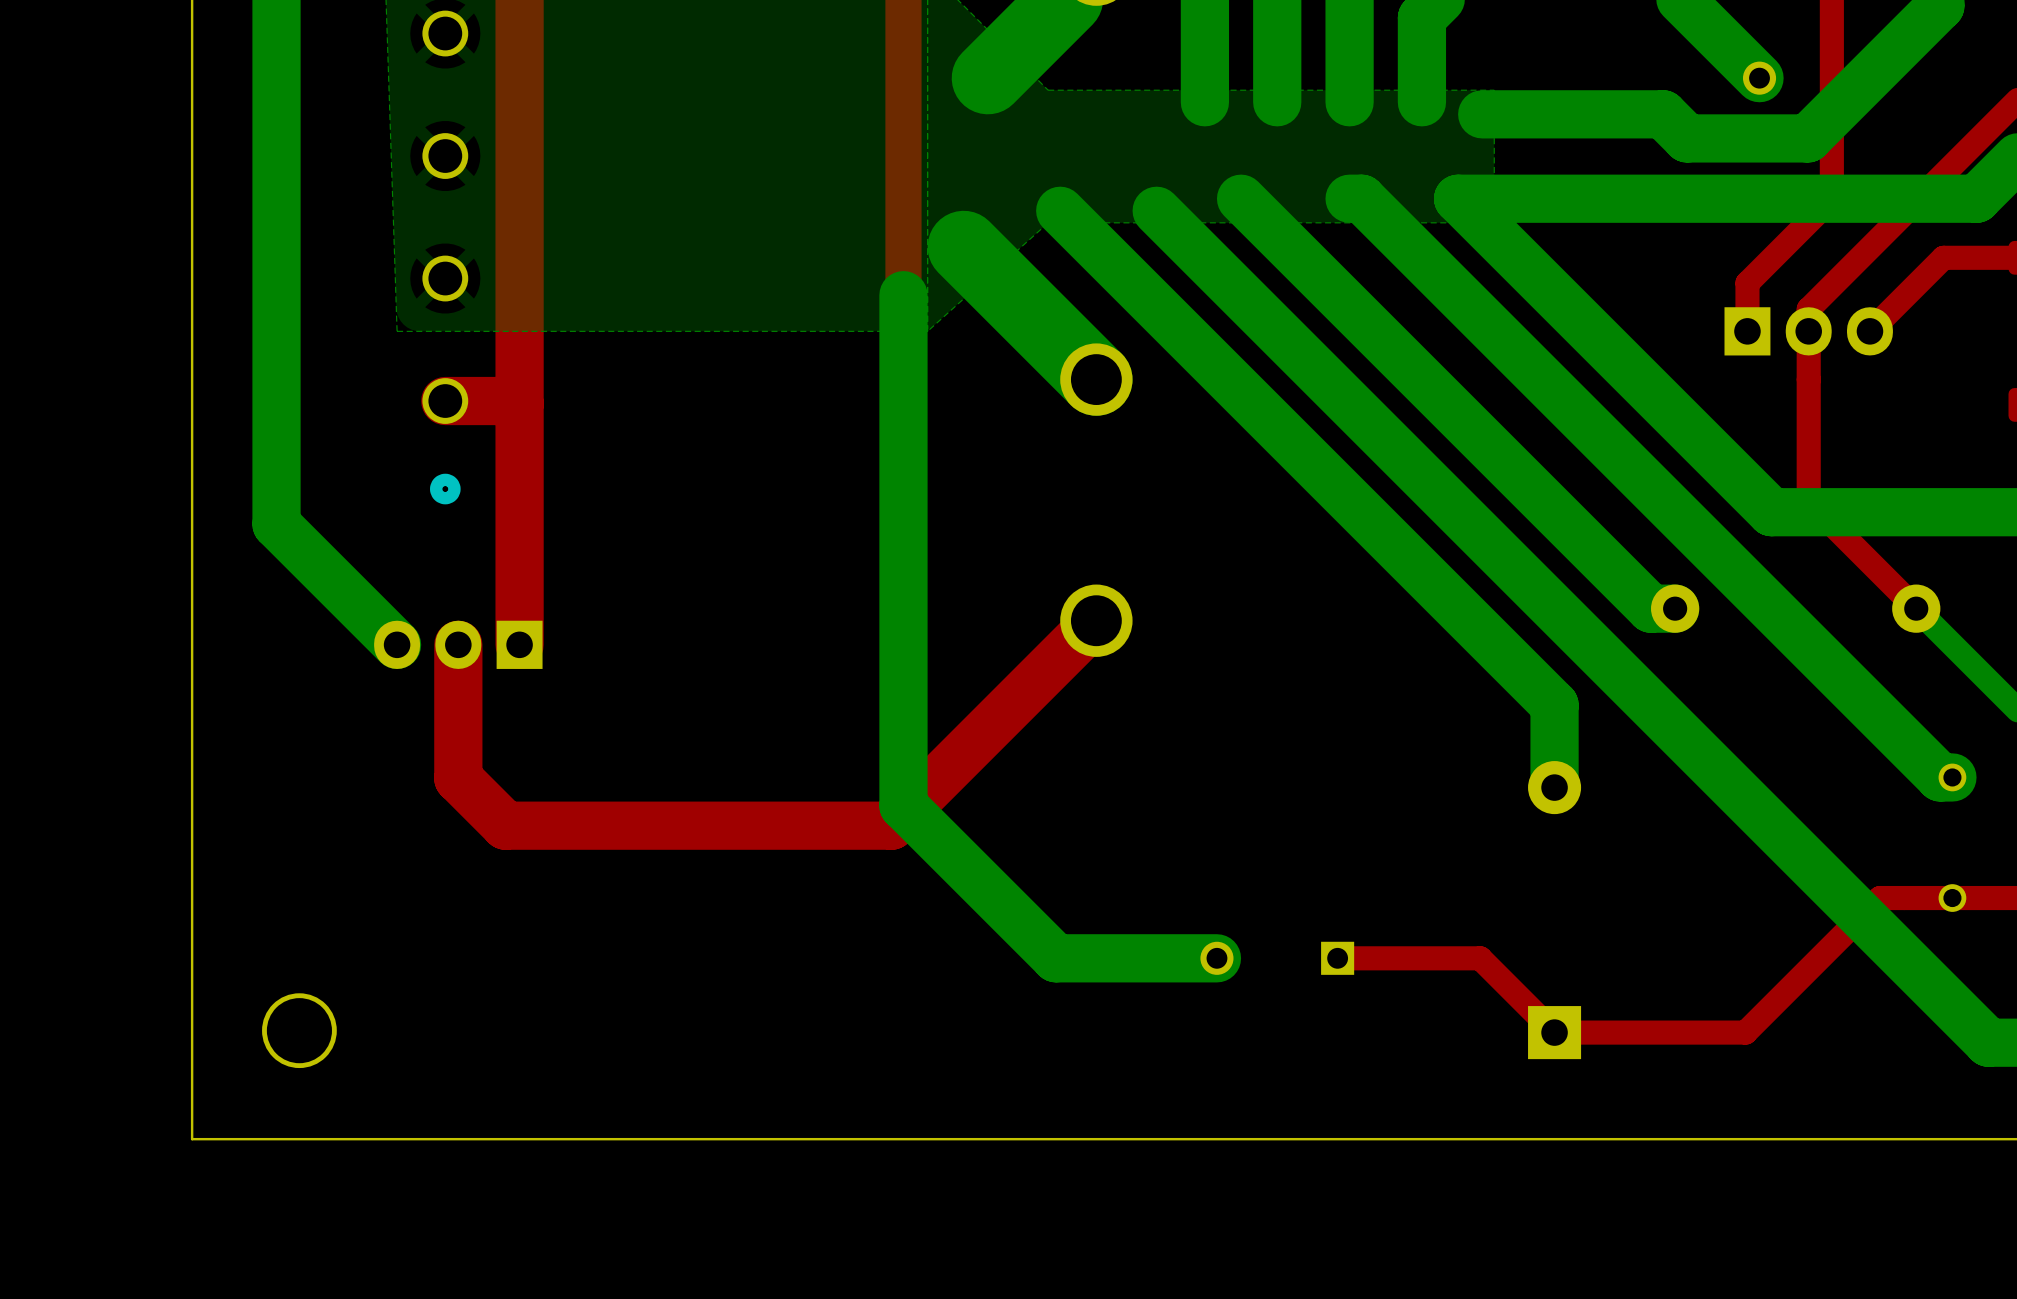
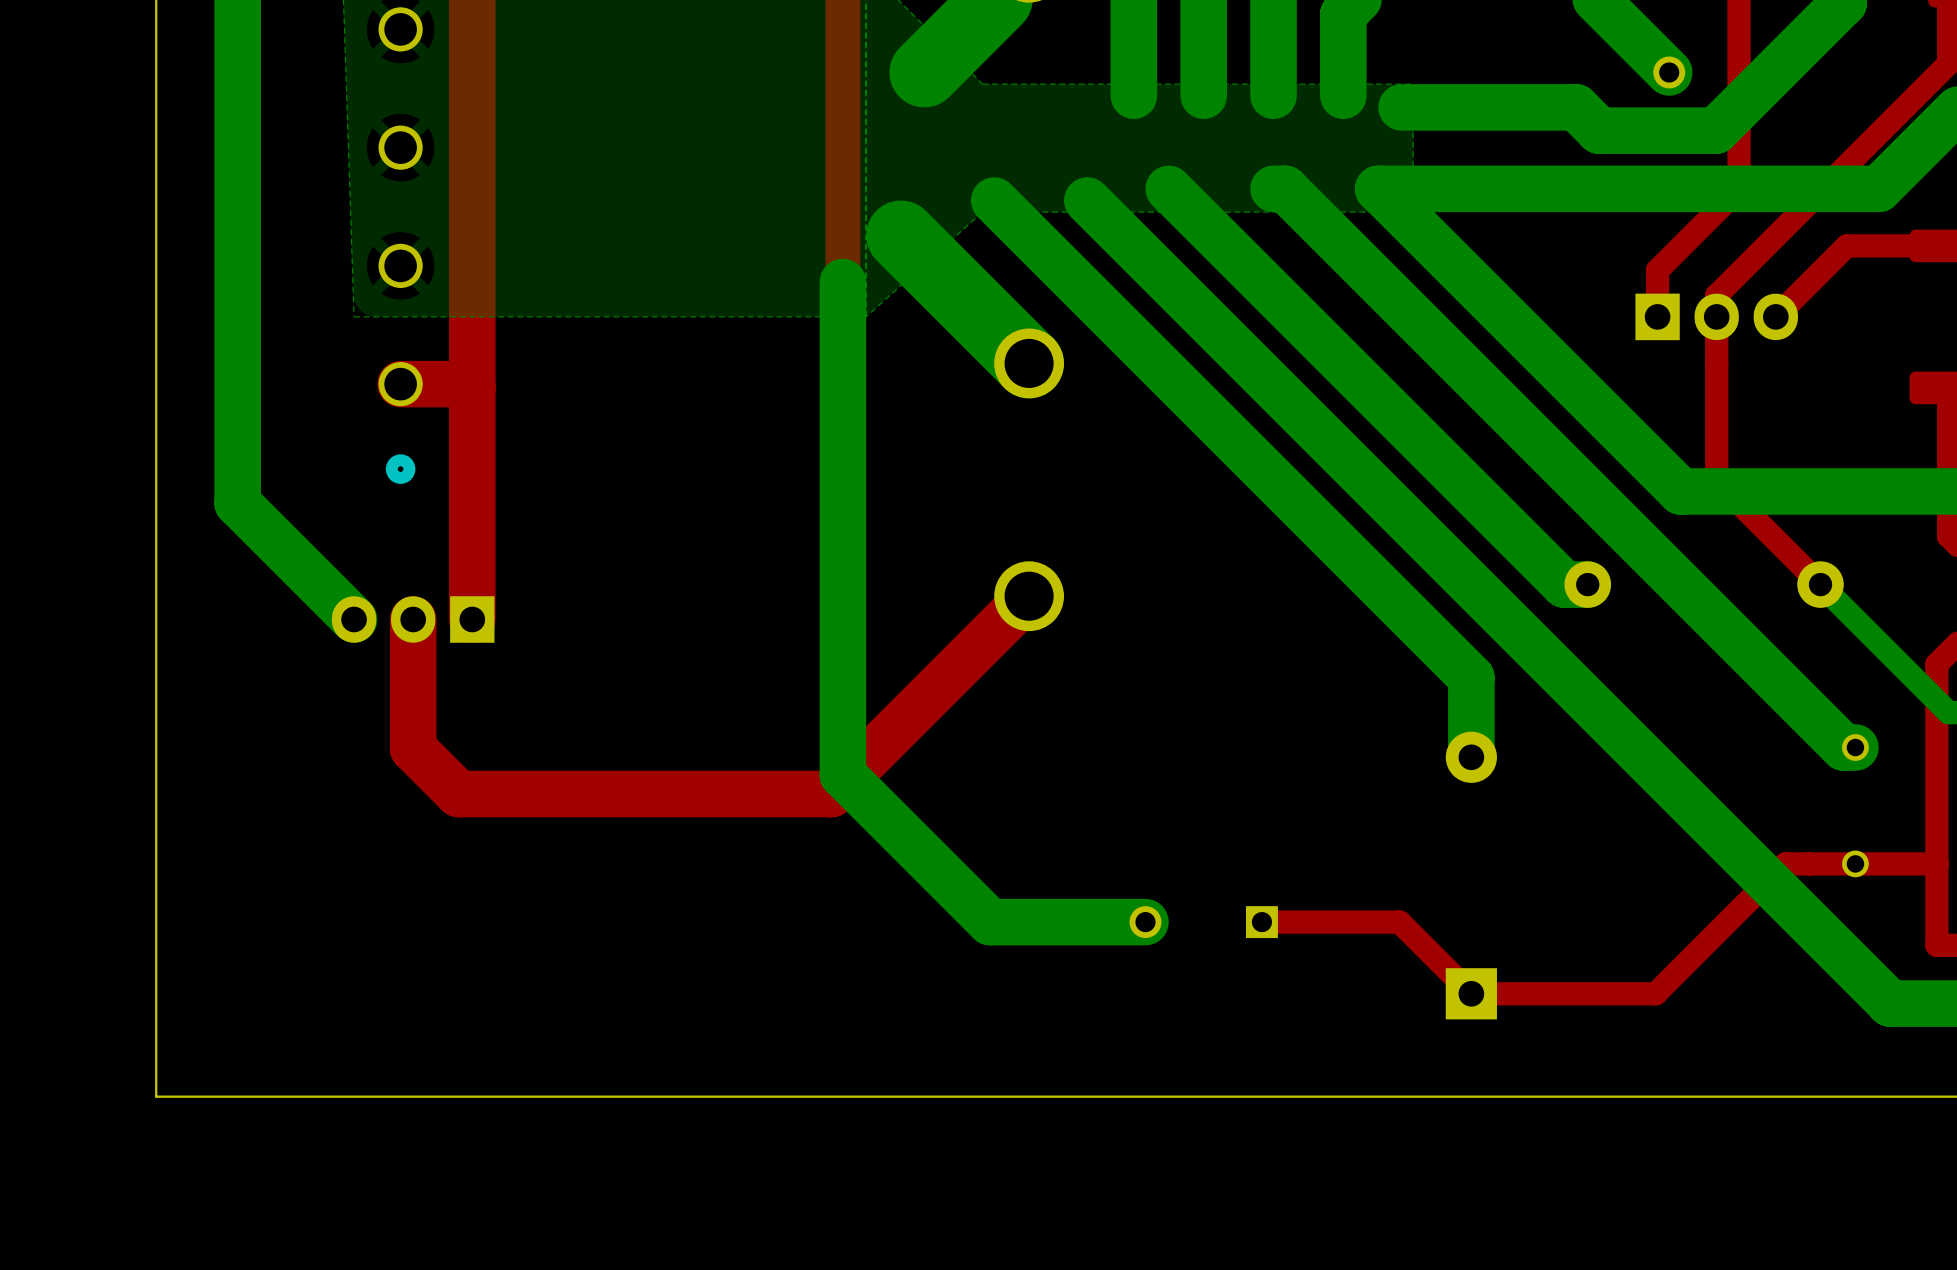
round board edge: [262, 993, 337, 1069] -> none

